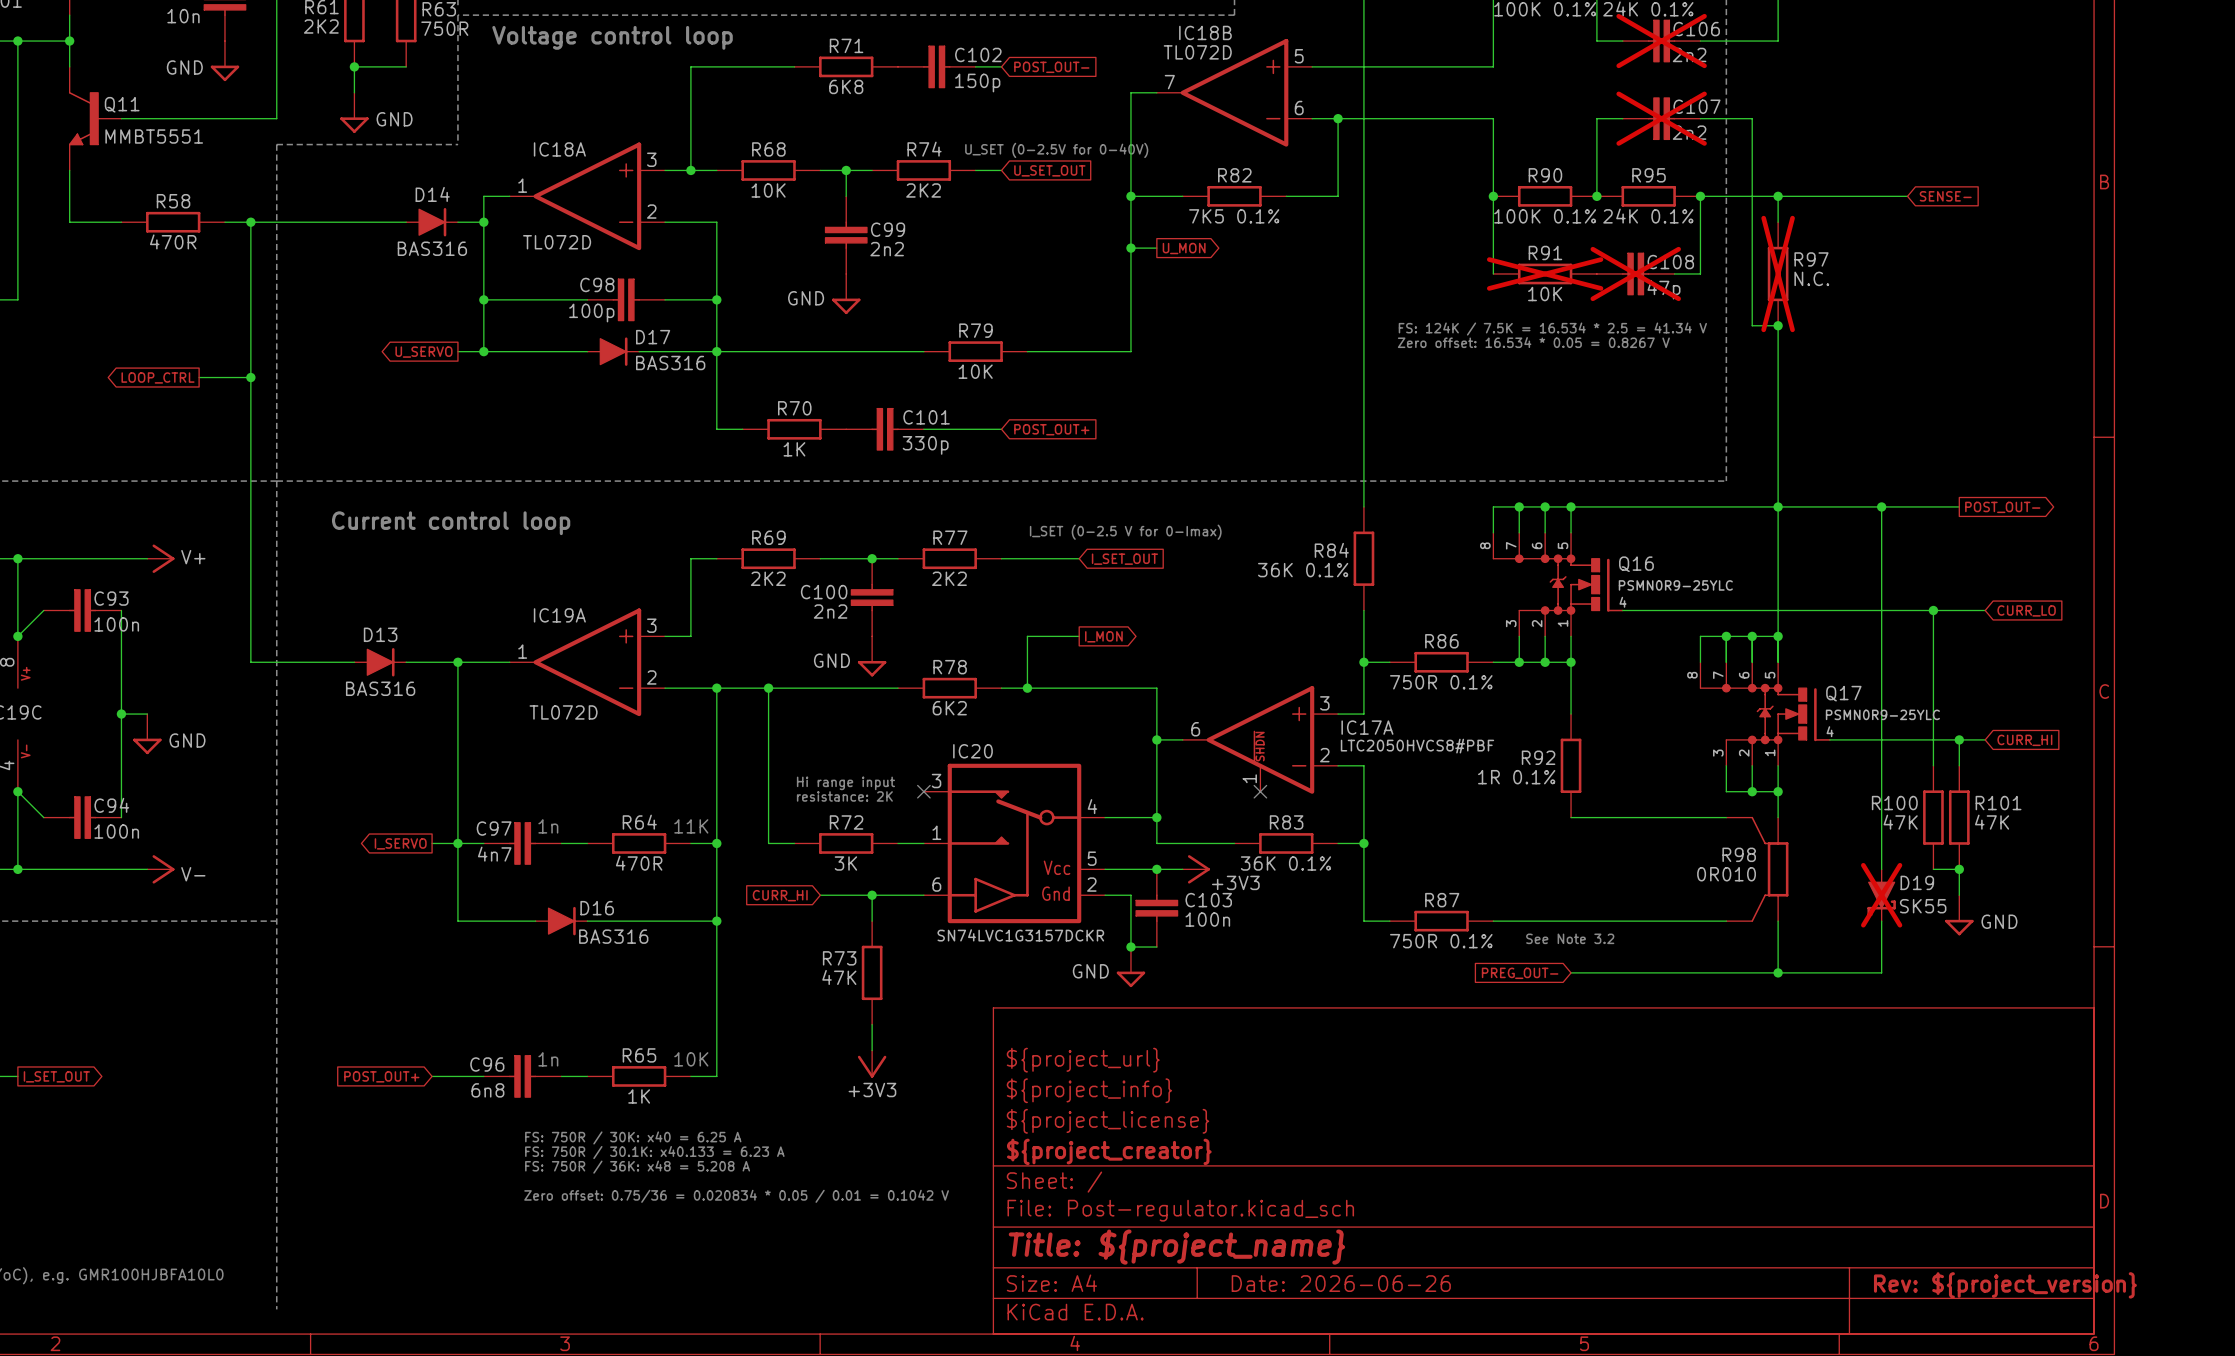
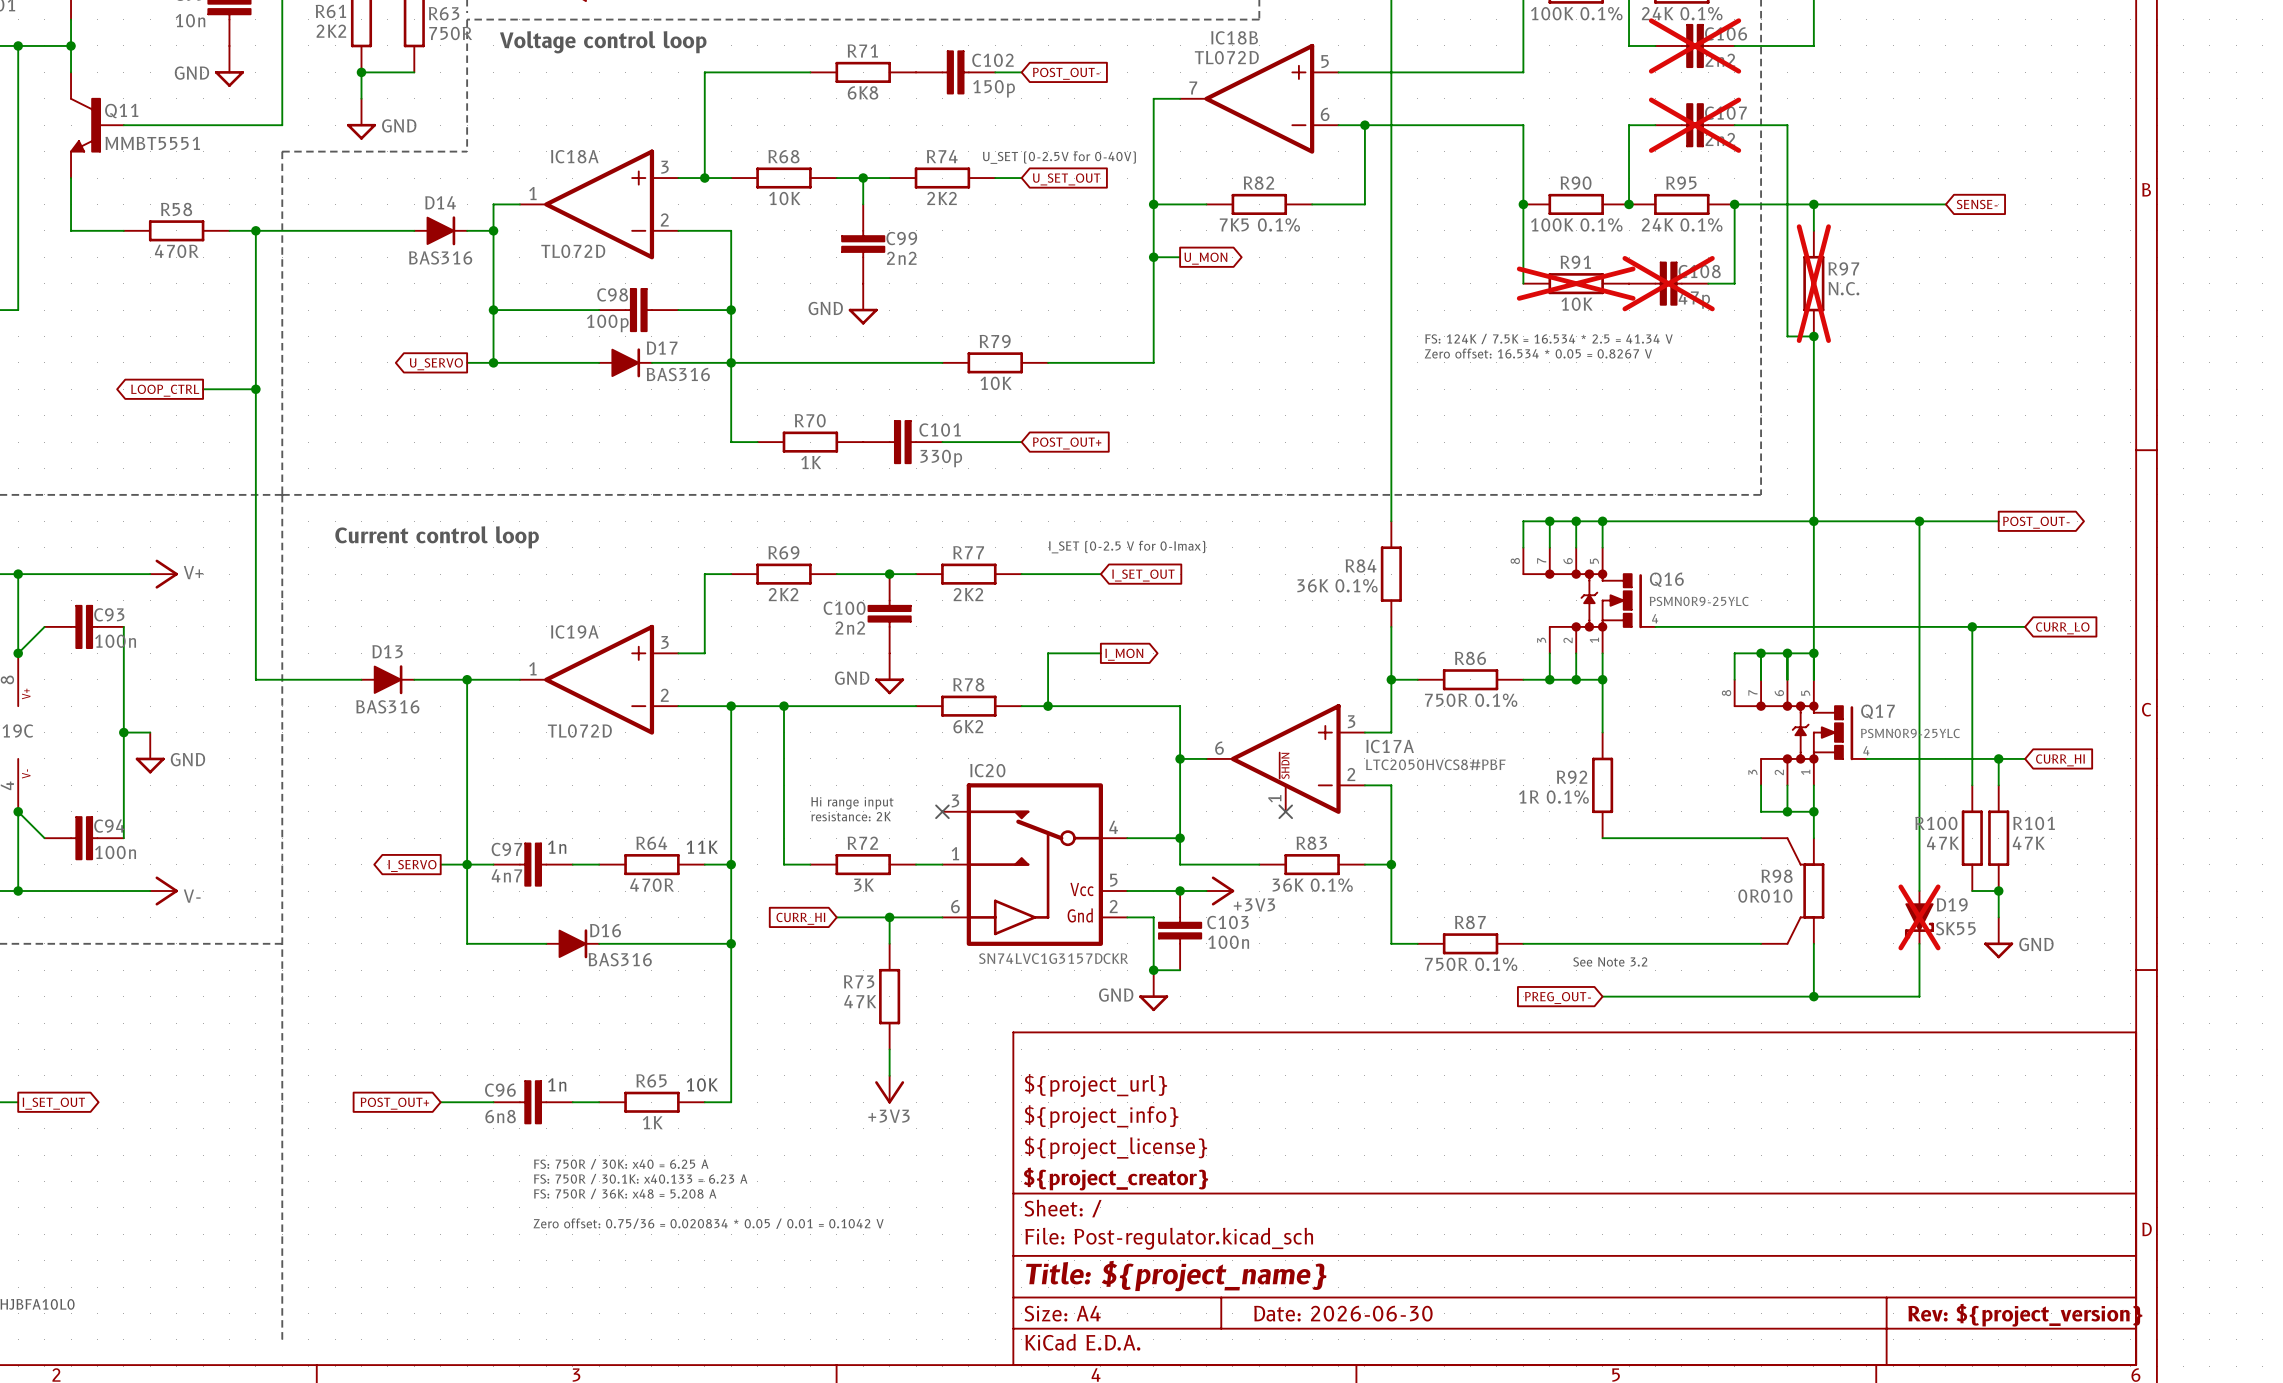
title block: Date: 2026-06-26 (1341, 1283) -> Date: 2026-06-30 (1343, 1313)

